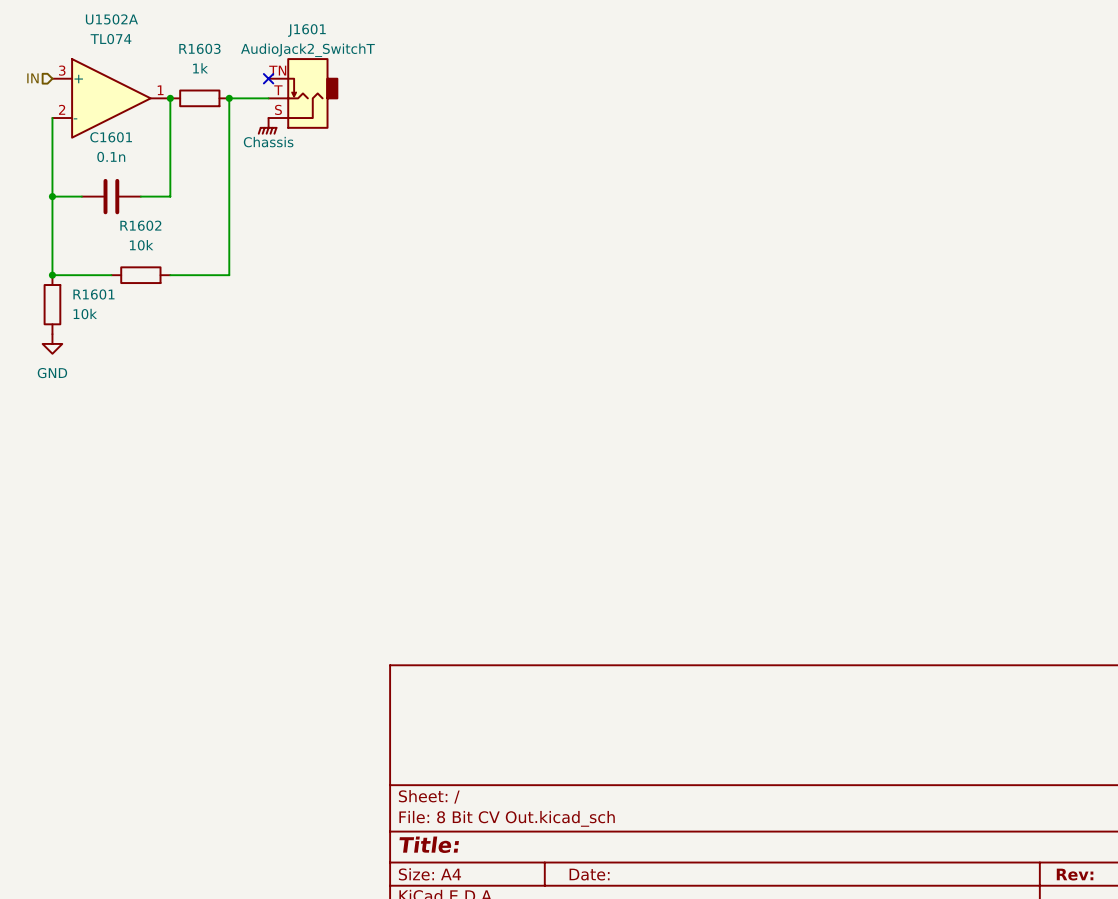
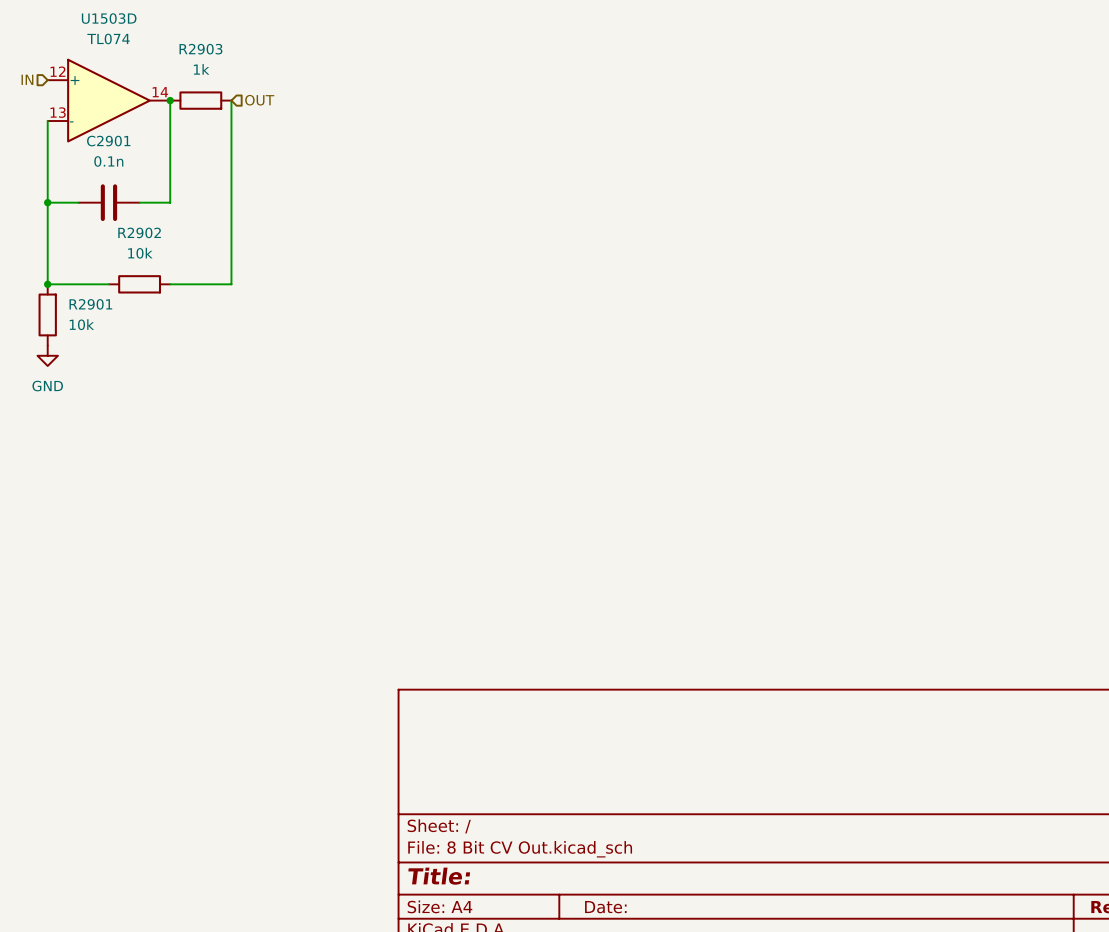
U1502A name: U1502A (111, 19) -> U1503D (109, 18)
R1603 name: R1603 (199, 48) -> R2903 (200, 49)
U1502A pin number: 3 (62, 70) -> 12 (57, 71)
no-connect mark: (268, 78) -> none
U1502A pin number: 1 (160, 90) -> 14 (160, 92)
J1601: AudioJack2_SwitchT (303, 93) -> none
wire: (229, 98) (268, 98) -> none
junction: (229, 98) -> none
hierarchical label: none -> OUT (259, 100)
U1502A pin number: 2 (62, 109) -> 13 (58, 112)
power symbol: Chassis (267, 126) -> none
C1601 name: C1601 (111, 137) -> C2901 (108, 141)
R1602 name: R1602 (140, 225) -> R2902 (139, 232)
R1601 name: R1601 (93, 294) -> R2901 (90, 304)

